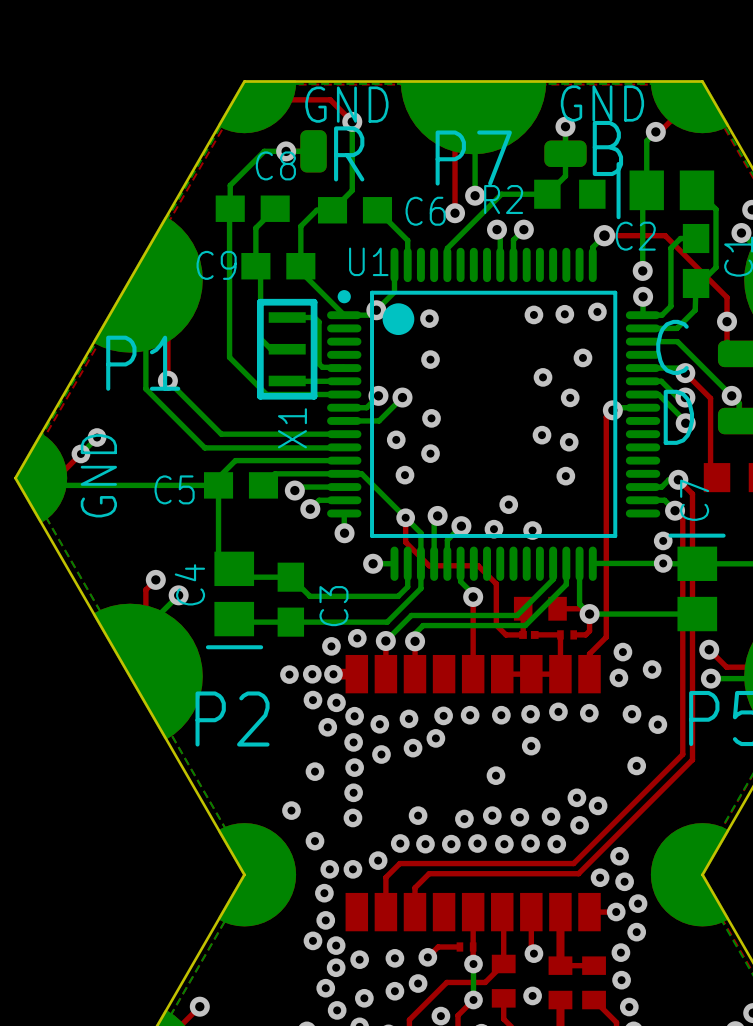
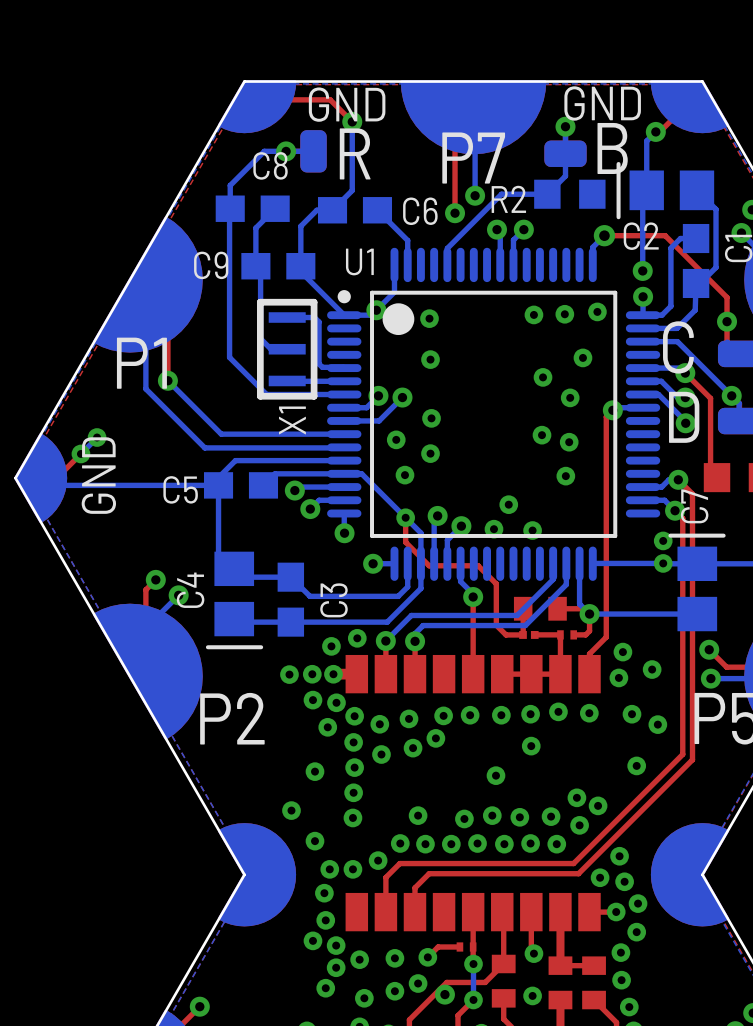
via: none -> (444, 994)
via: (337, 1010) -> none
via: (440, 1016) -> none

